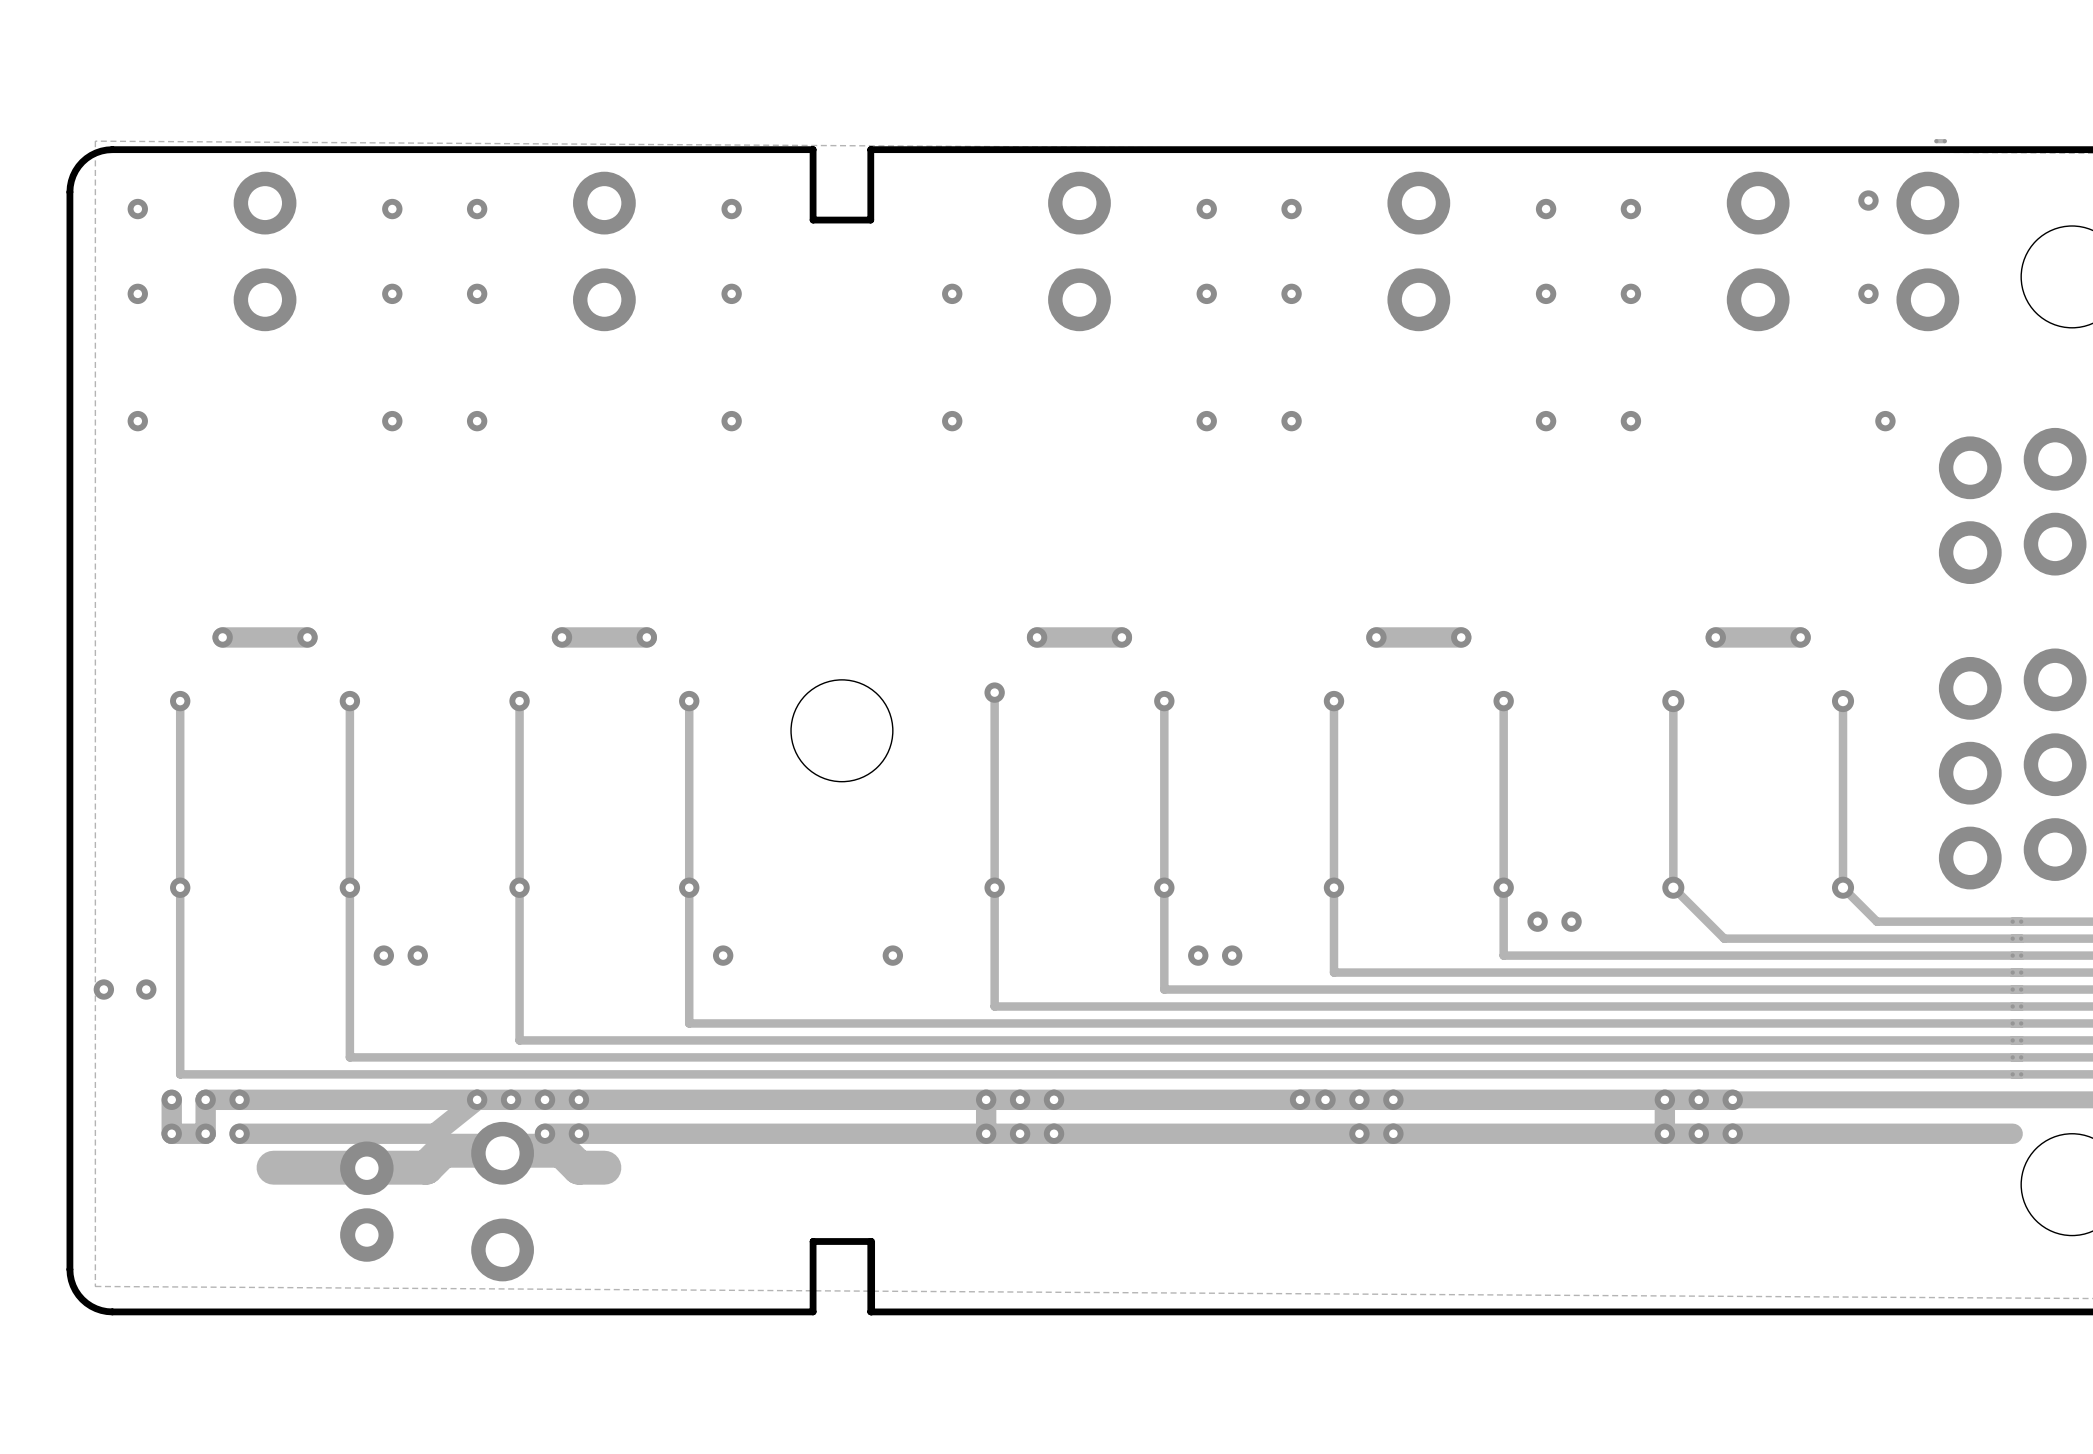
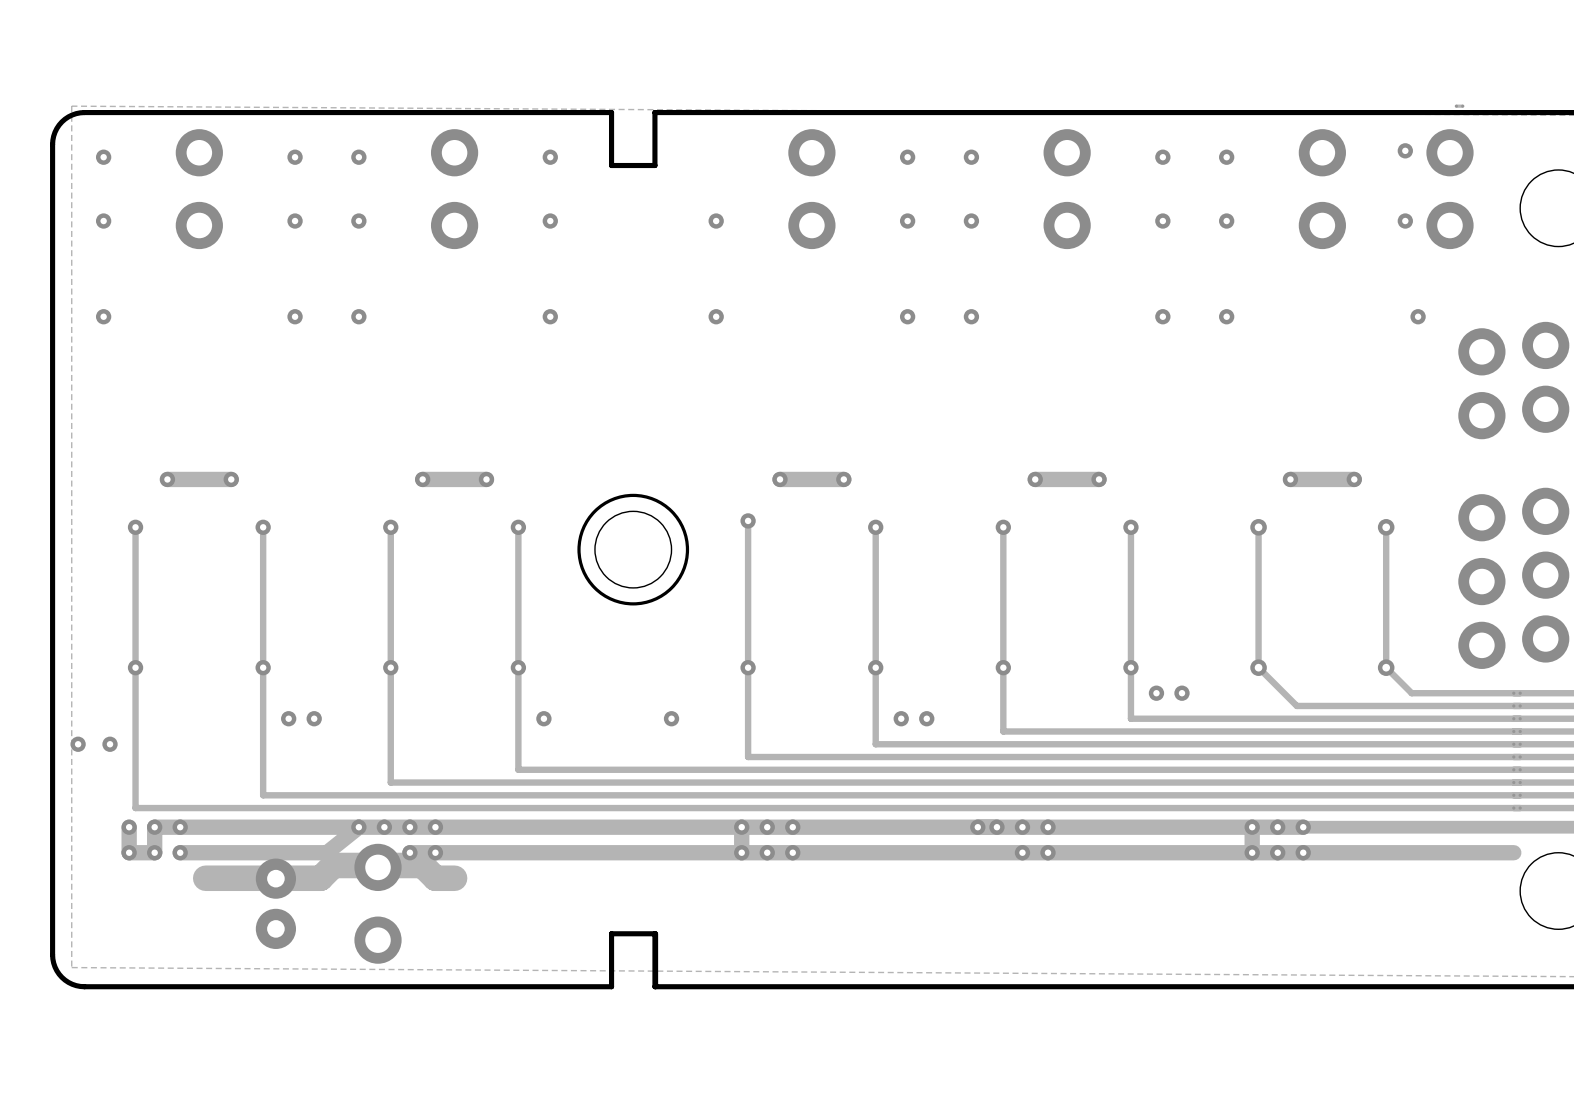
round board edge: none -> [577, 493, 690, 606]

